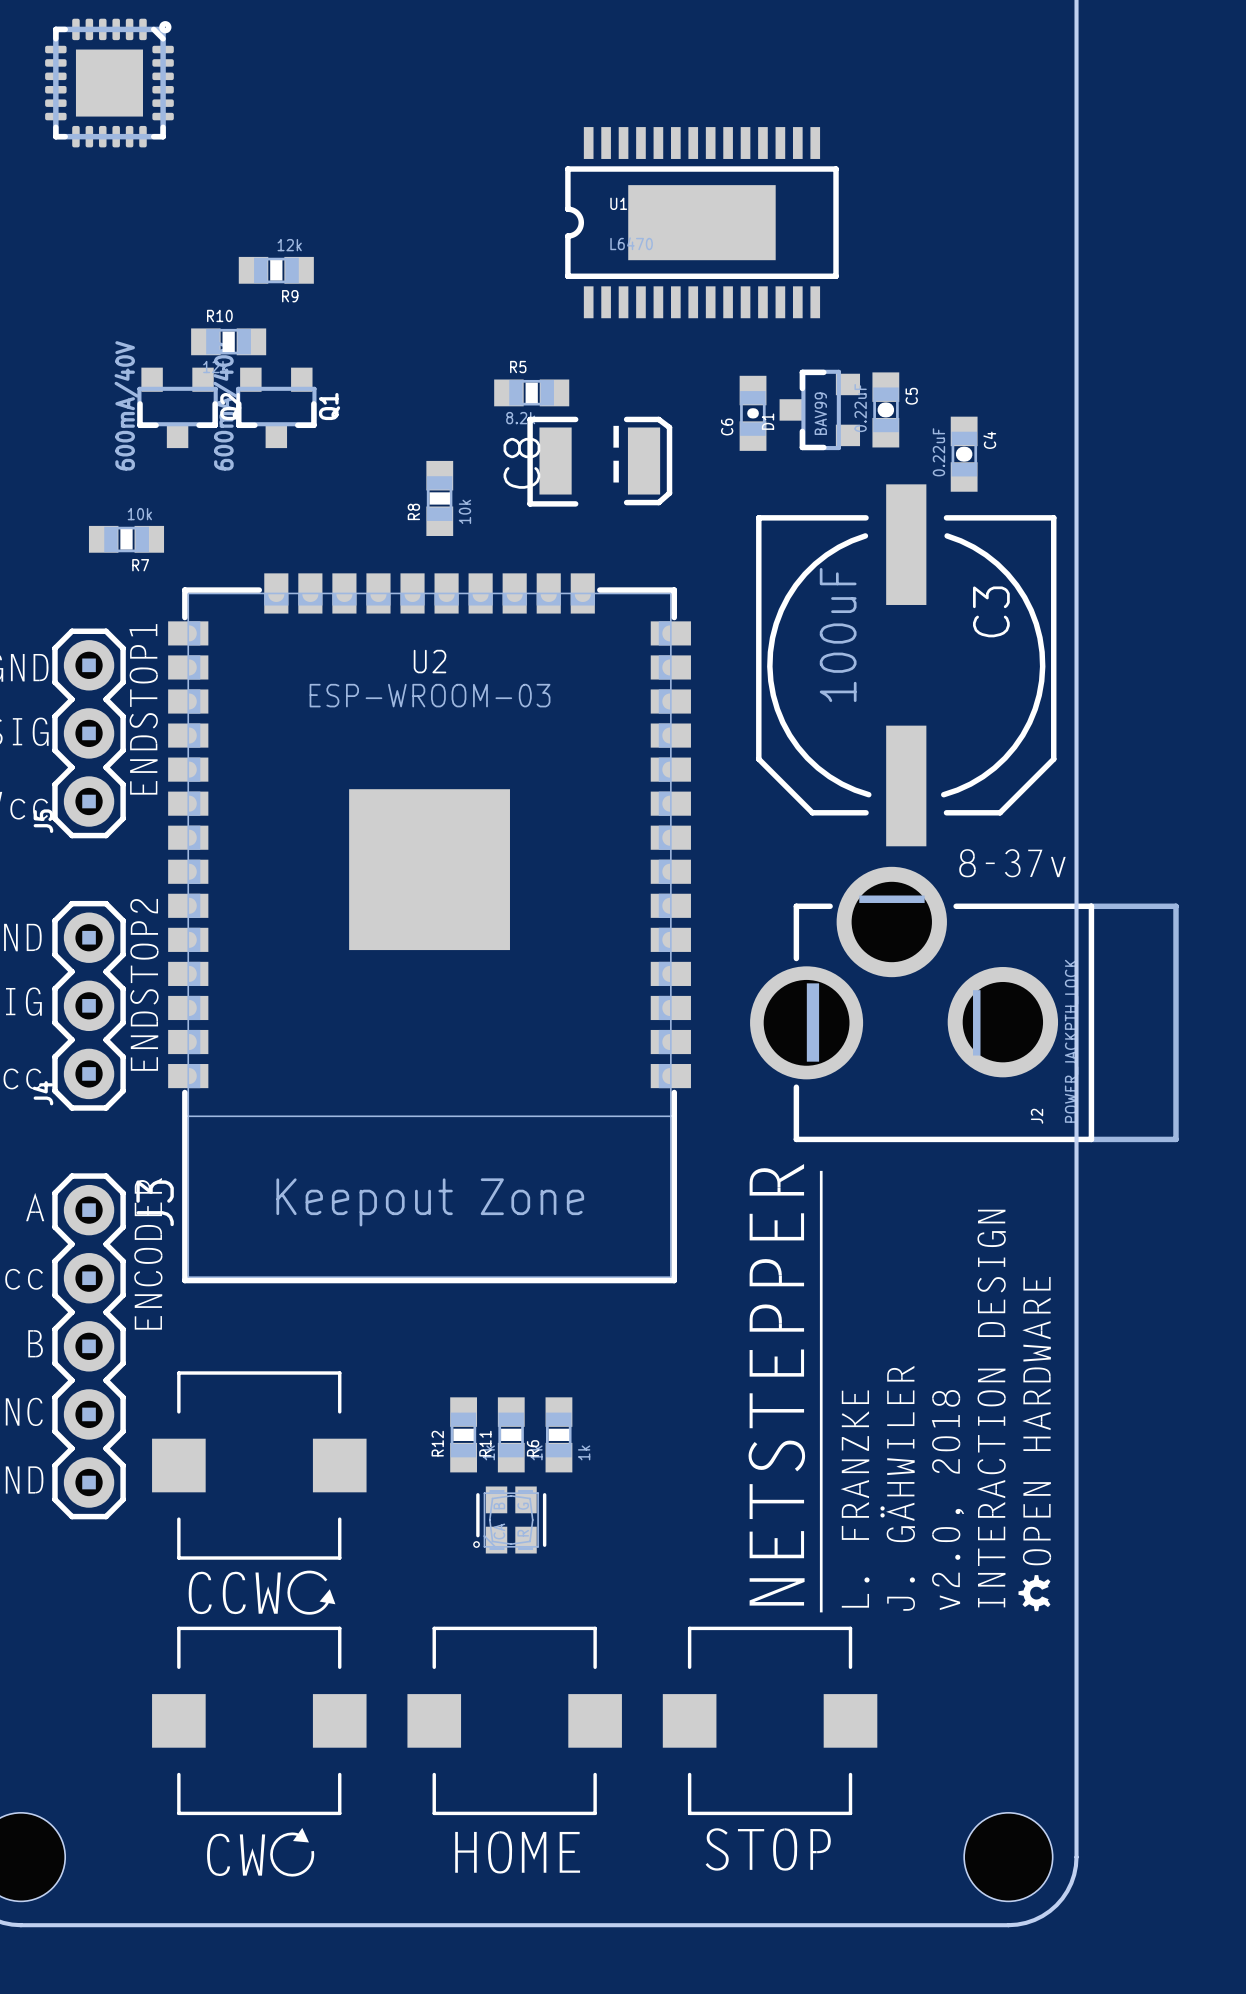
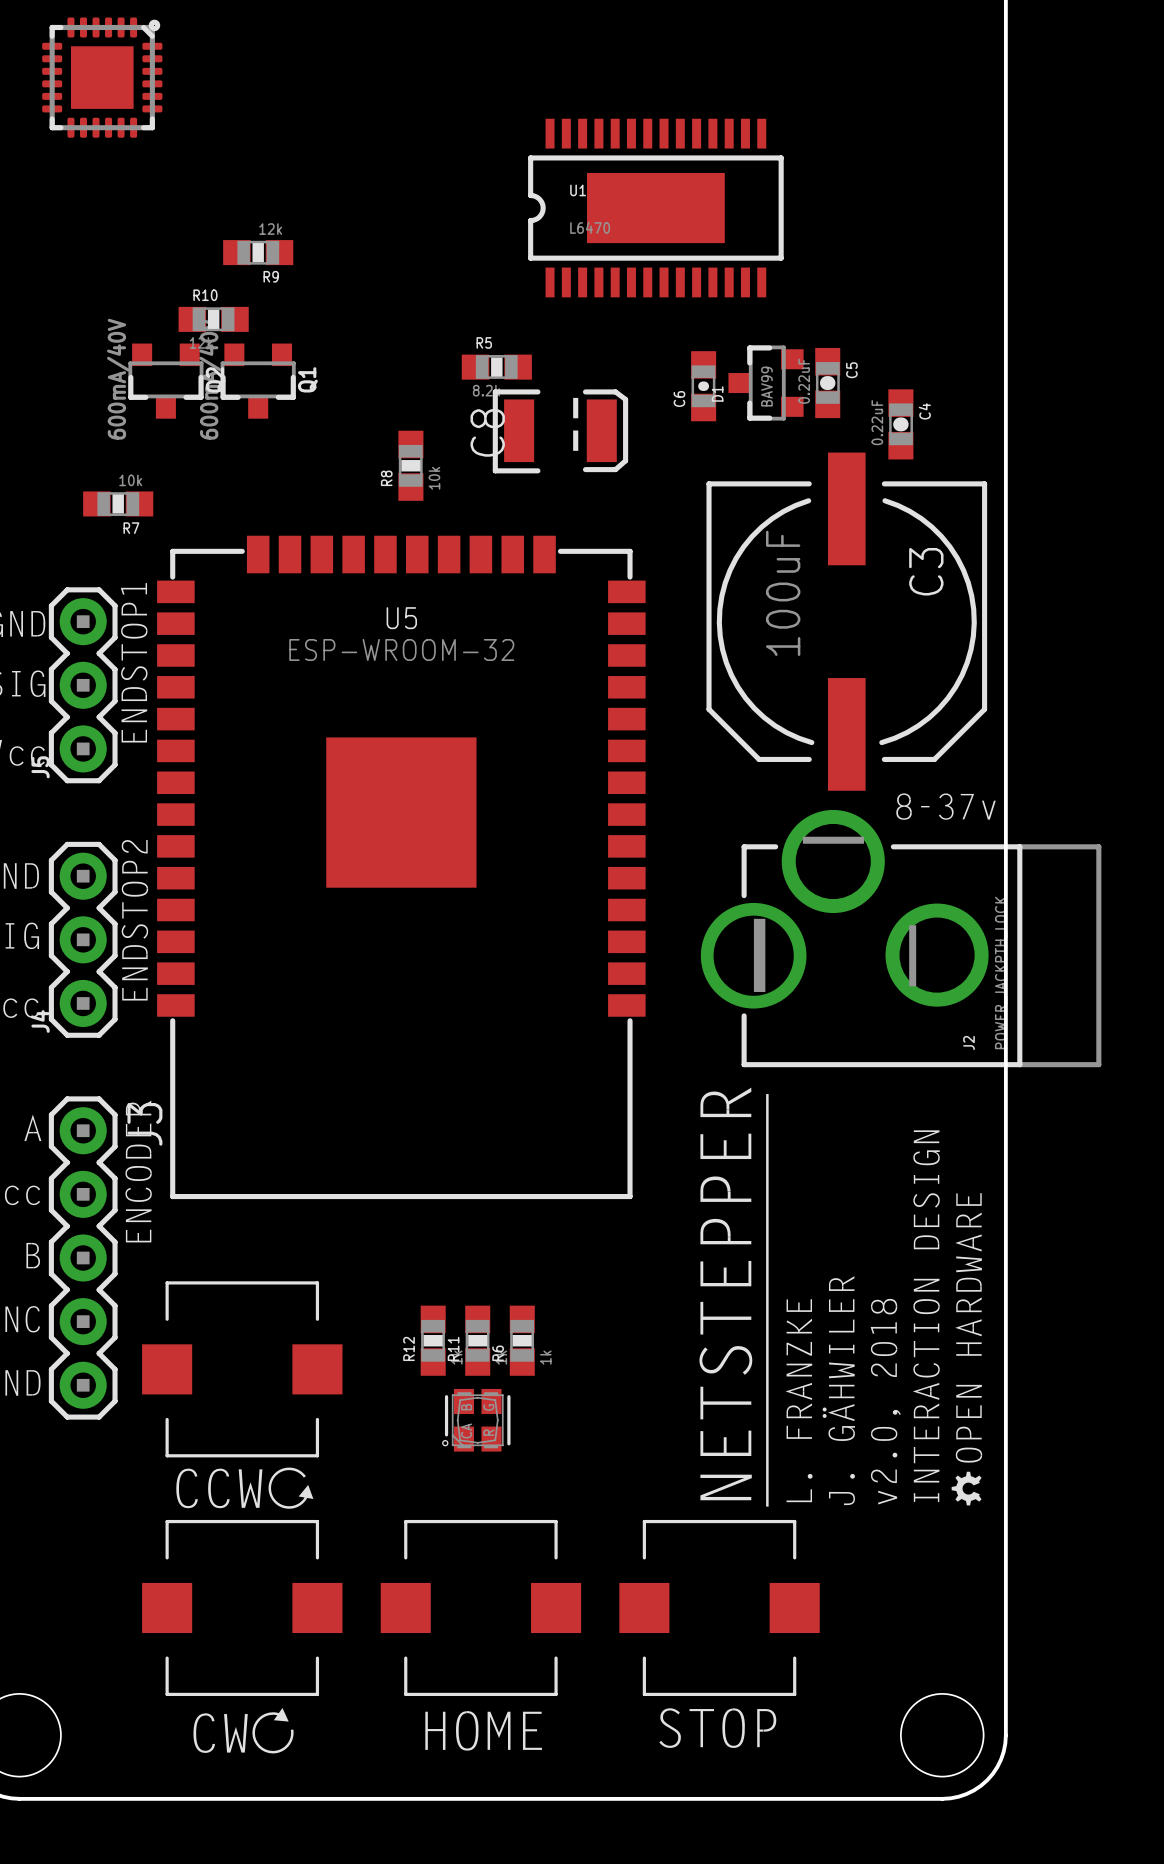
U2: ESP-WROOM-03 (429, 928) -> none
U5: none -> ESP-WROOM-32 (401, 867)

